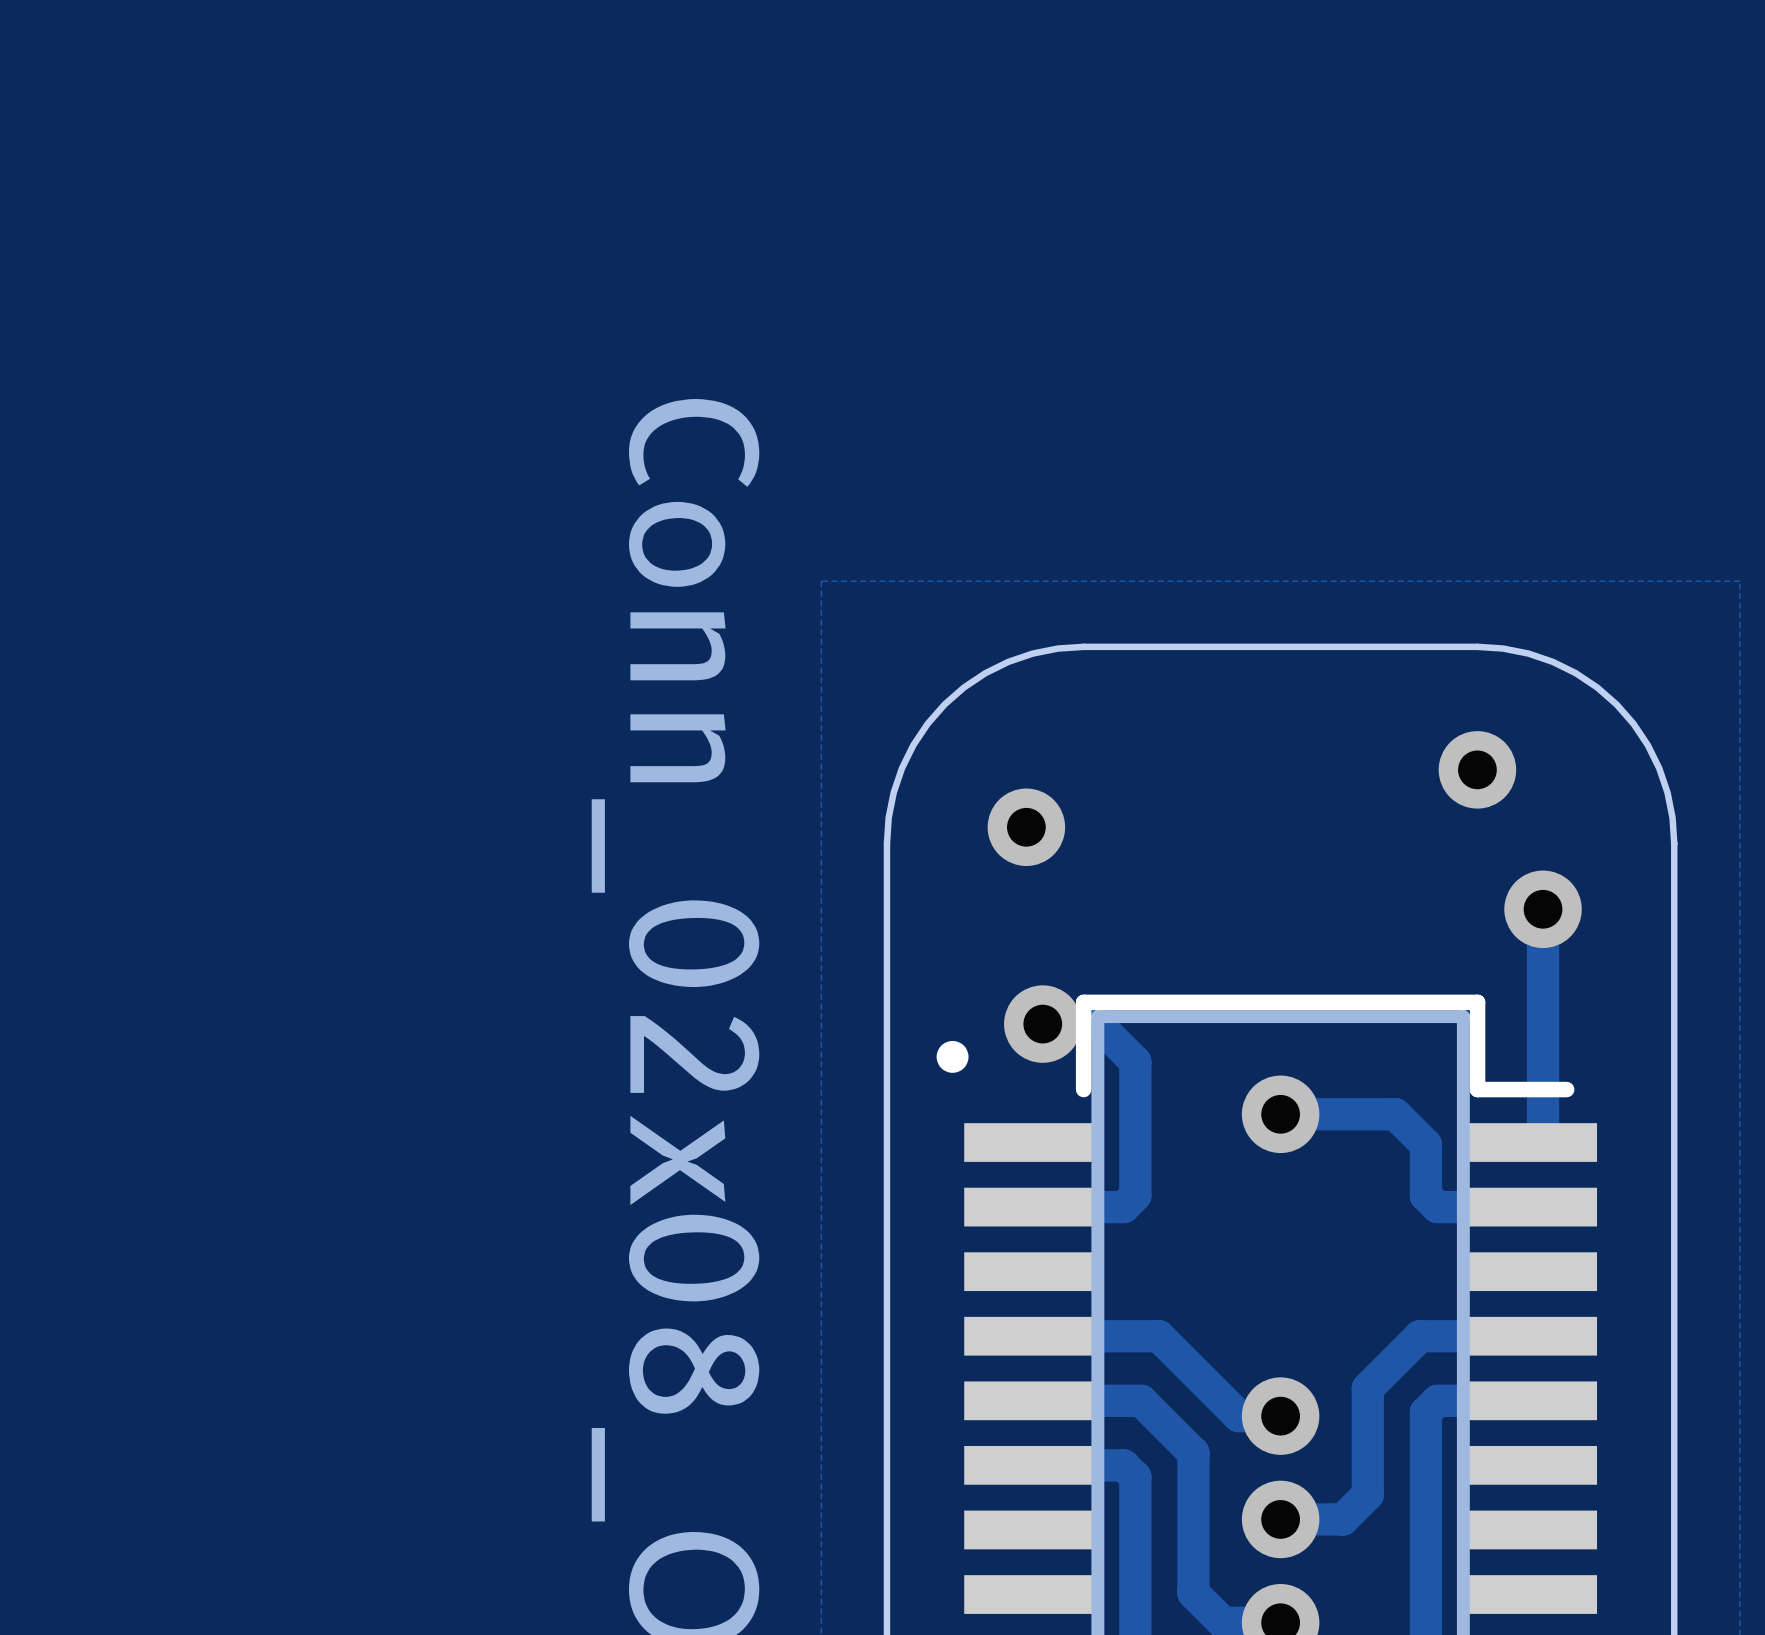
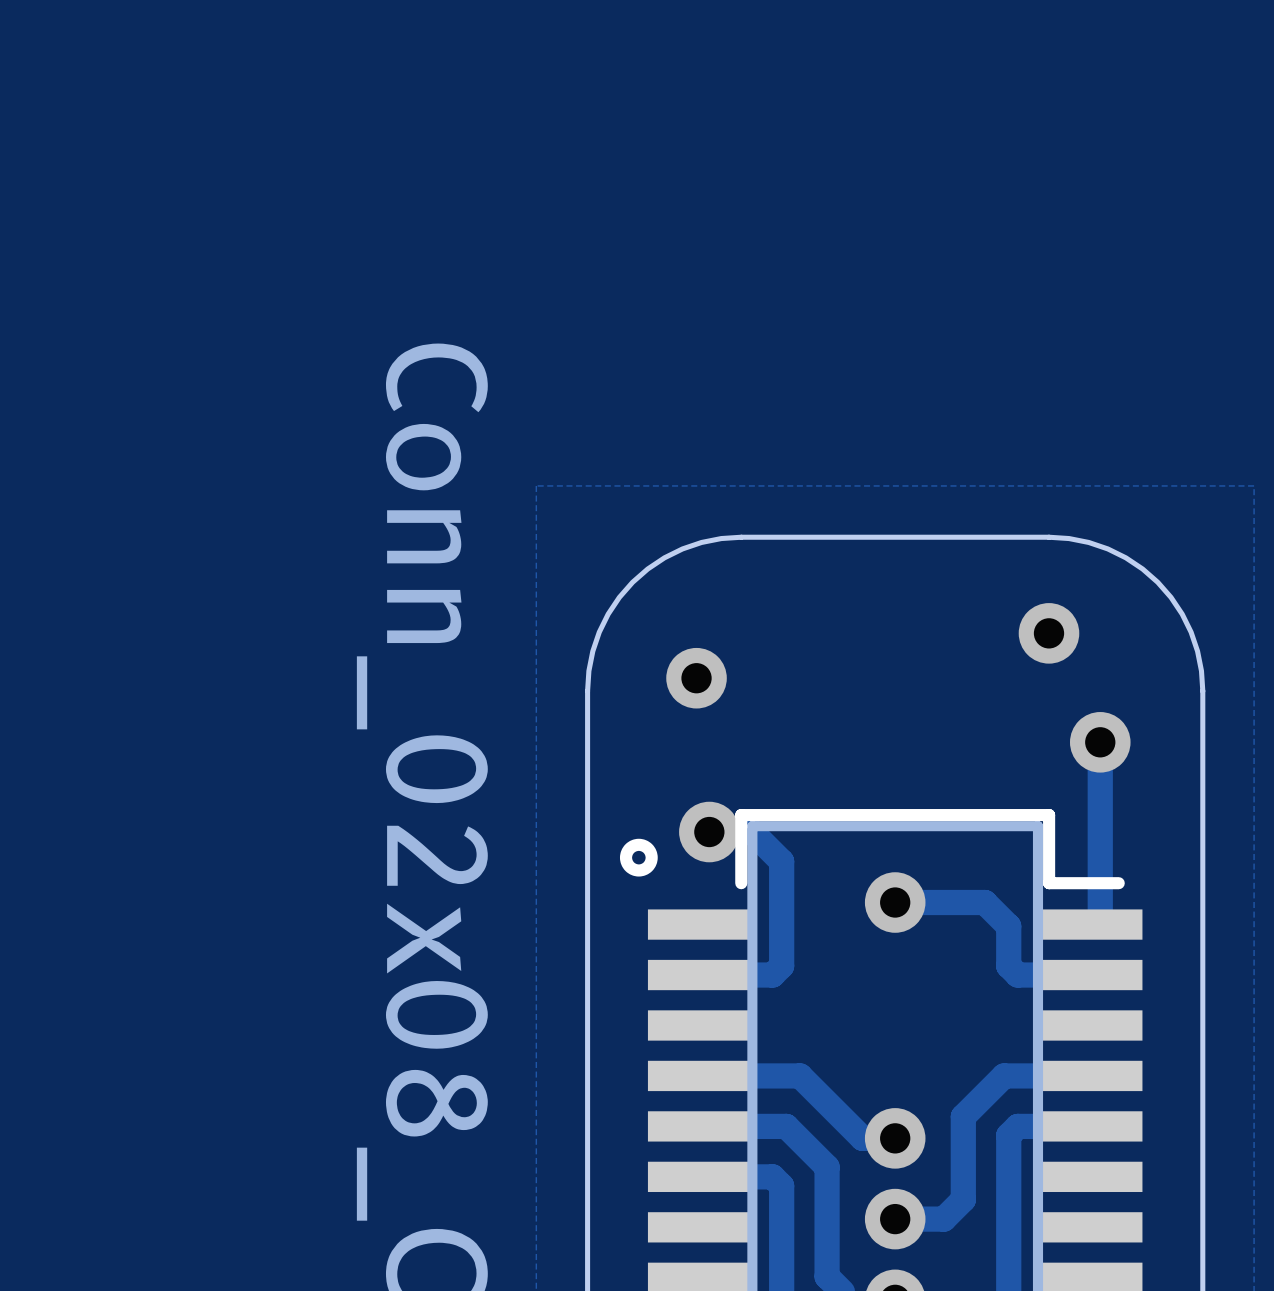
drawing shape: [936, 1040, 969, 1073] -> [619, 838, 658, 877]

